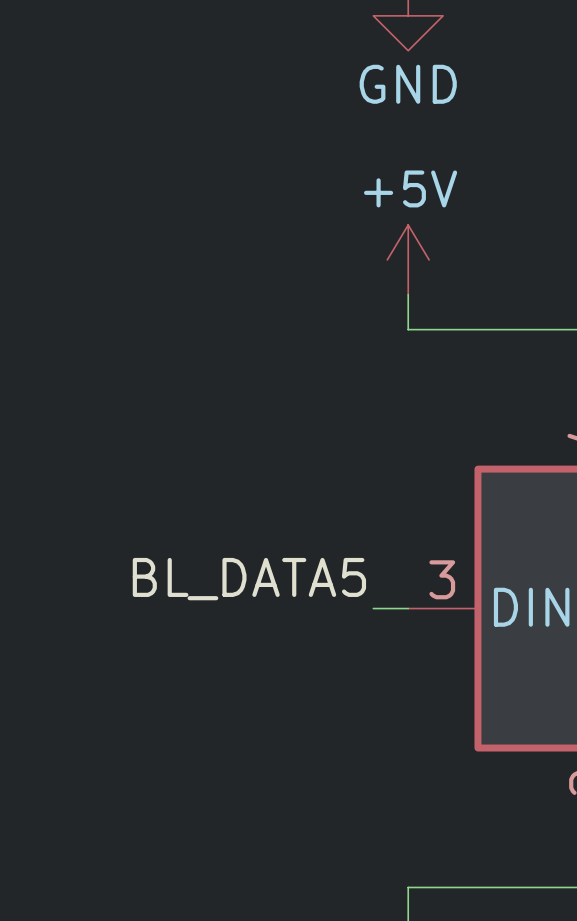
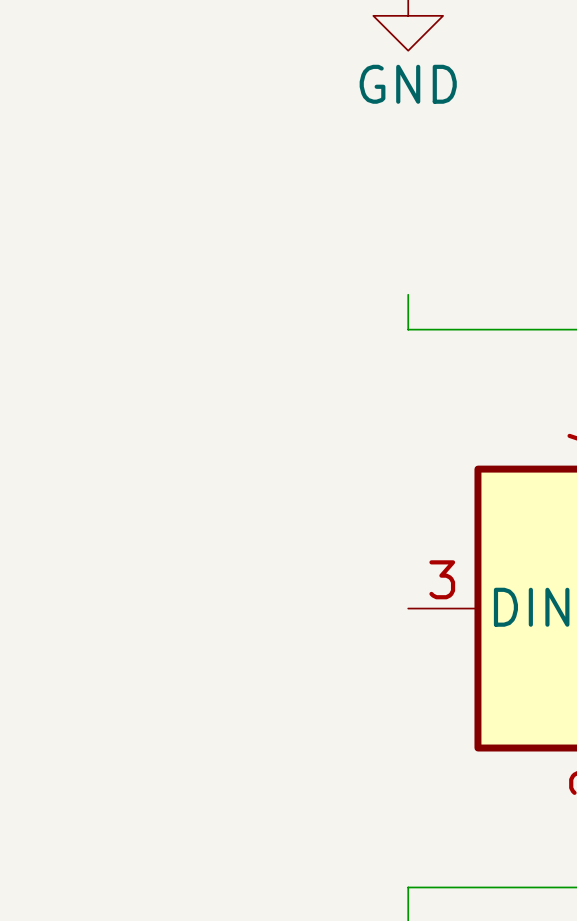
power symbol: +5V (408, 259) -> none
label: BL_DATA5 (249, 579) -> none
wire: (373, 608) (408, 608) -> none

